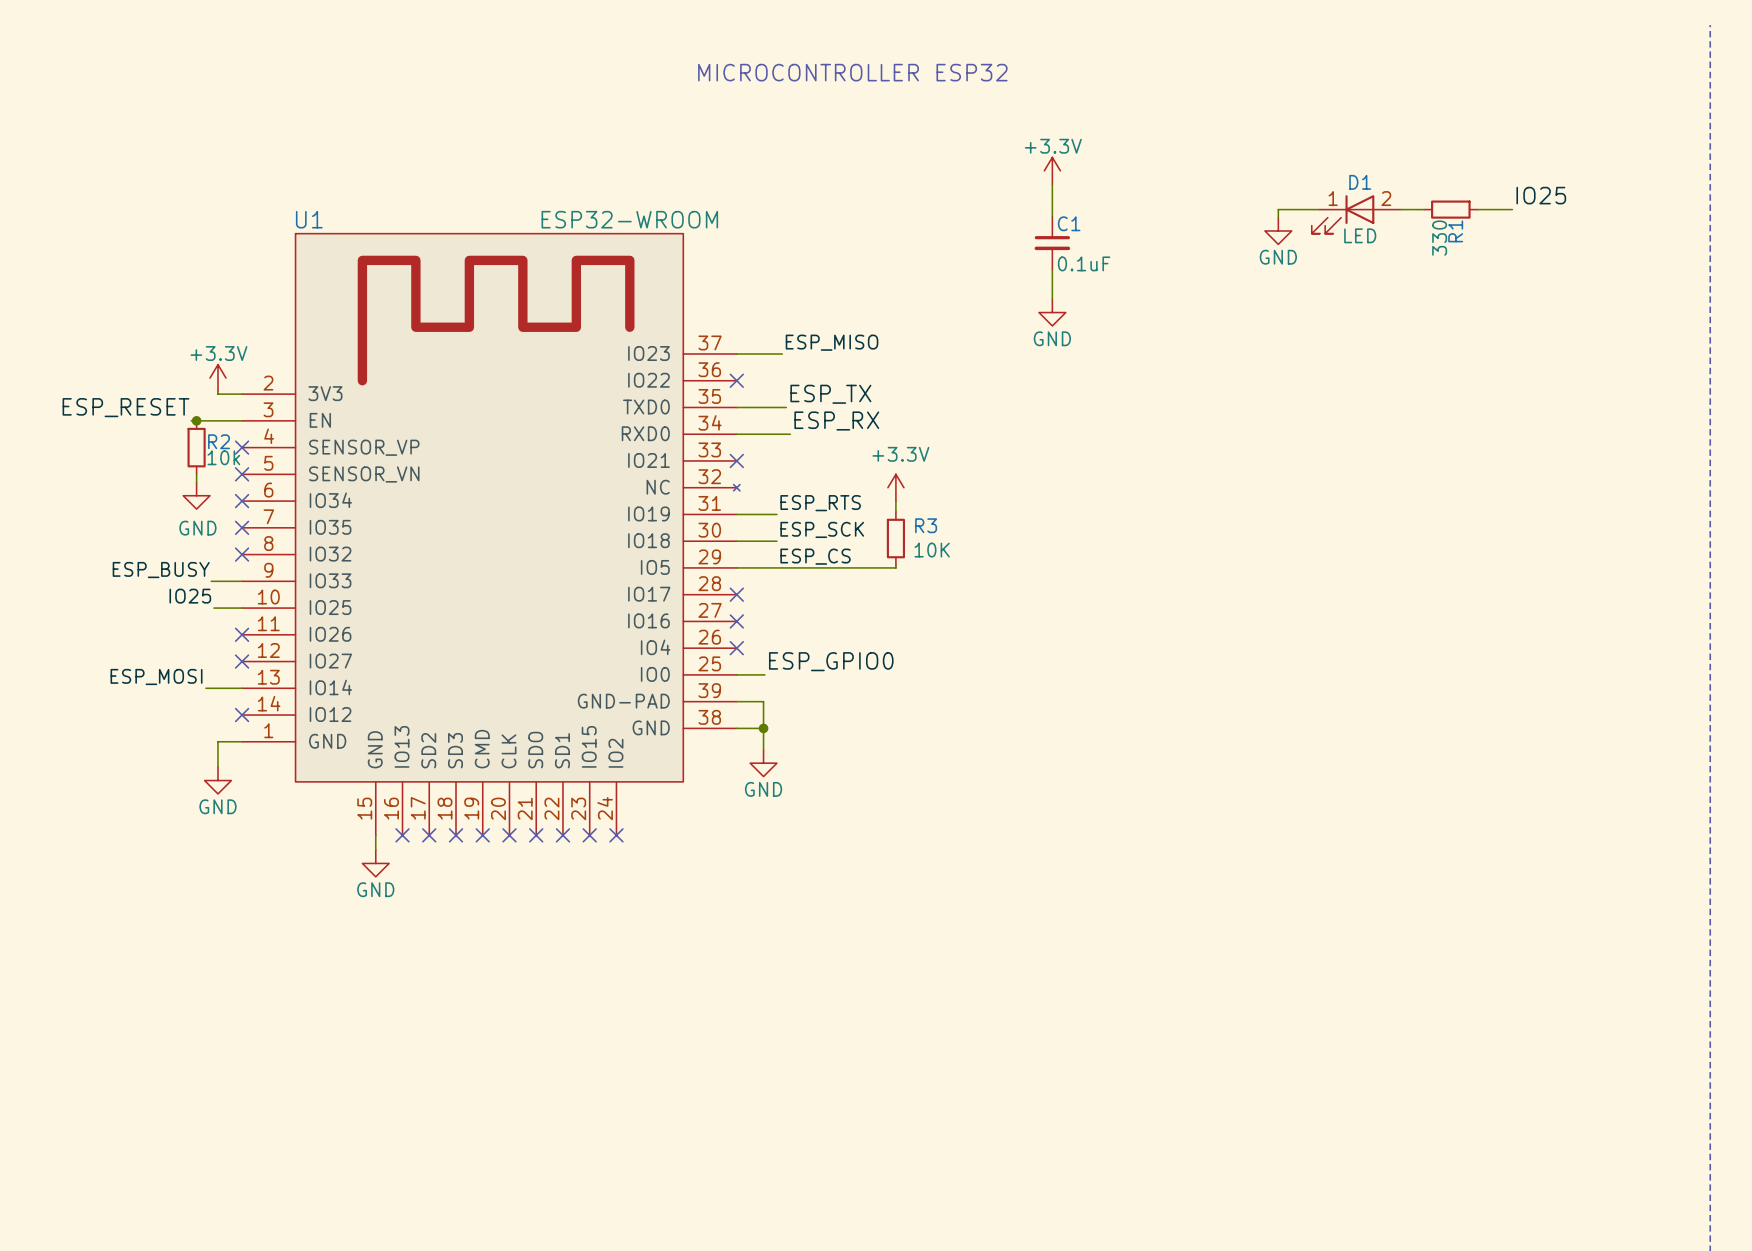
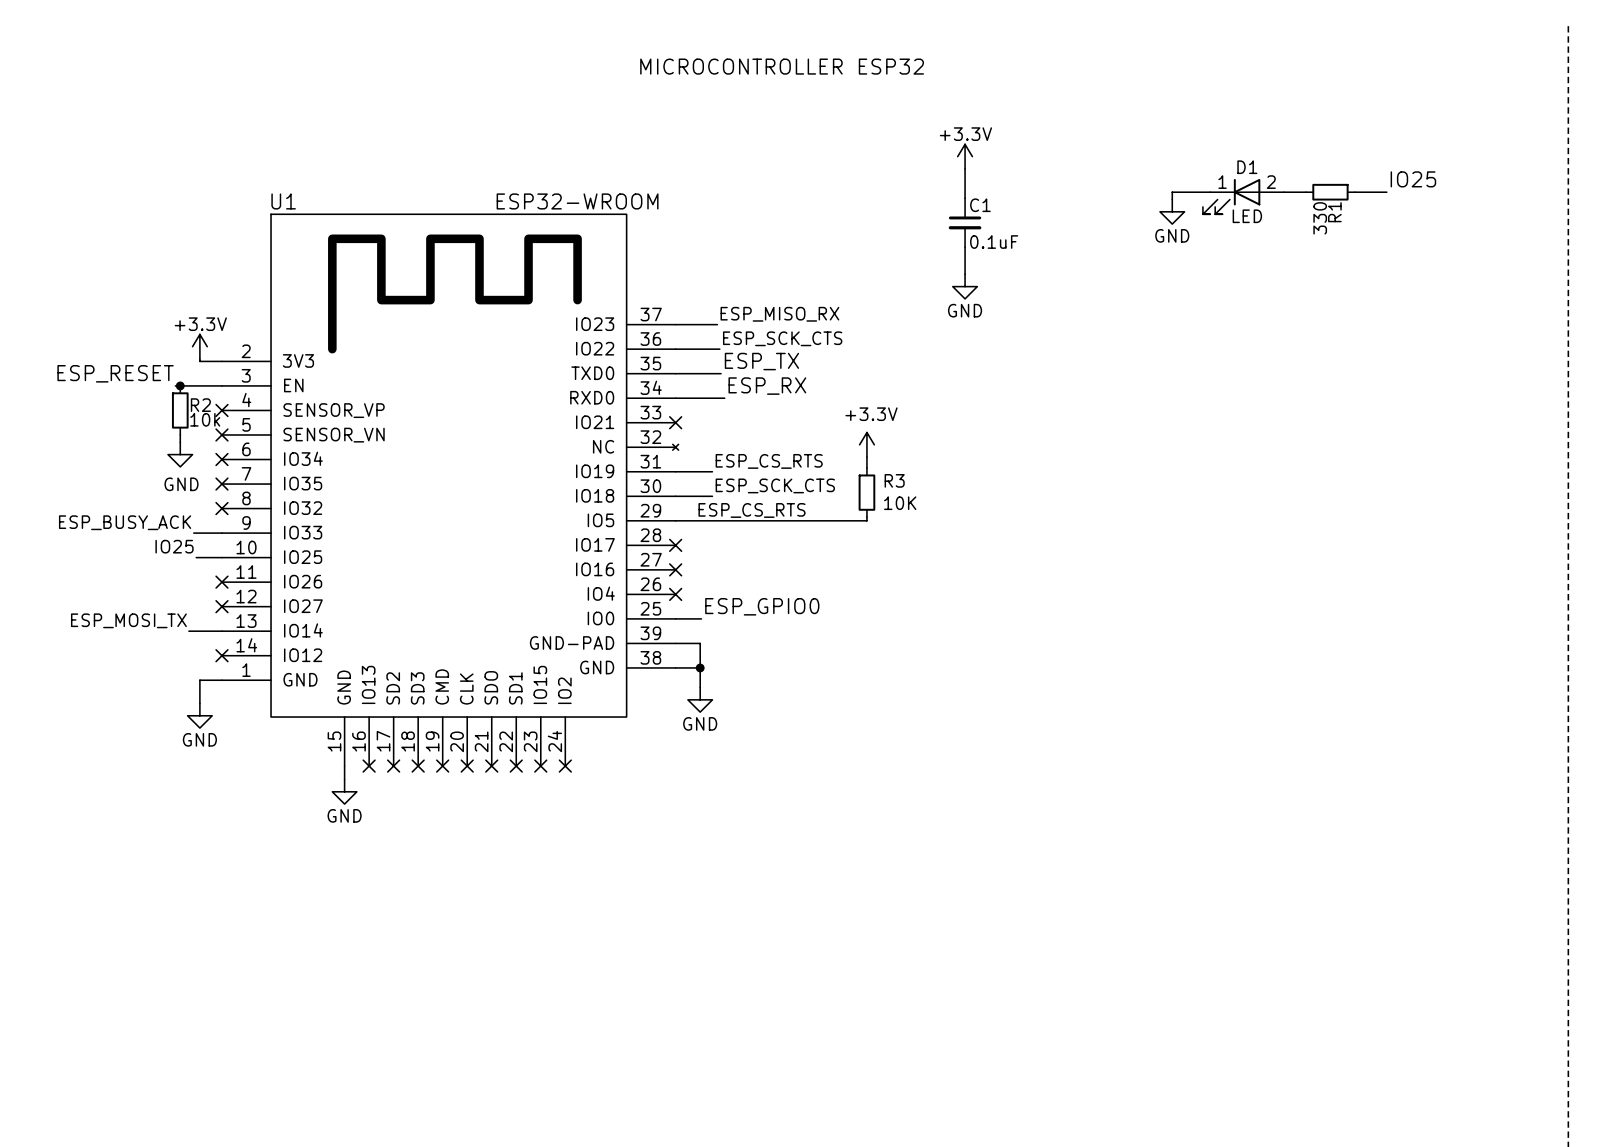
label: ESP_MISO (832, 342) -> ESP_MISO_RX (779, 314)
label: none -> ESP_SCK_CTS (782, 338)
wire: none -> (675, 349) (719, 349)
no-connect mark: (736, 380) -> none
power symbol position: +3.3V (895, 487) -> +3.3V (866, 444)
wire: none -> (866, 457) (866, 468)
wire: (895, 501) (895, 511) -> none
label: ESP_RTS (820, 503) -> ESP_CS_RTS (769, 461)
label: ESP_SCK (822, 529) -> ESP_SCK_CTS (775, 485)
R3 position: (895, 538) -> (866, 492)
label: ESP_CS (815, 556) -> ESP_CS_RTS (752, 510)
wire: (895, 565) (895, 567) -> (866, 517) (866, 520) (821, 520)
label: ESP_BUSY (161, 570) -> ESP_BUSY_ACK (125, 522)
label: ESP_MOSI (156, 676) -> ESP_MOSI_TX (128, 620)

